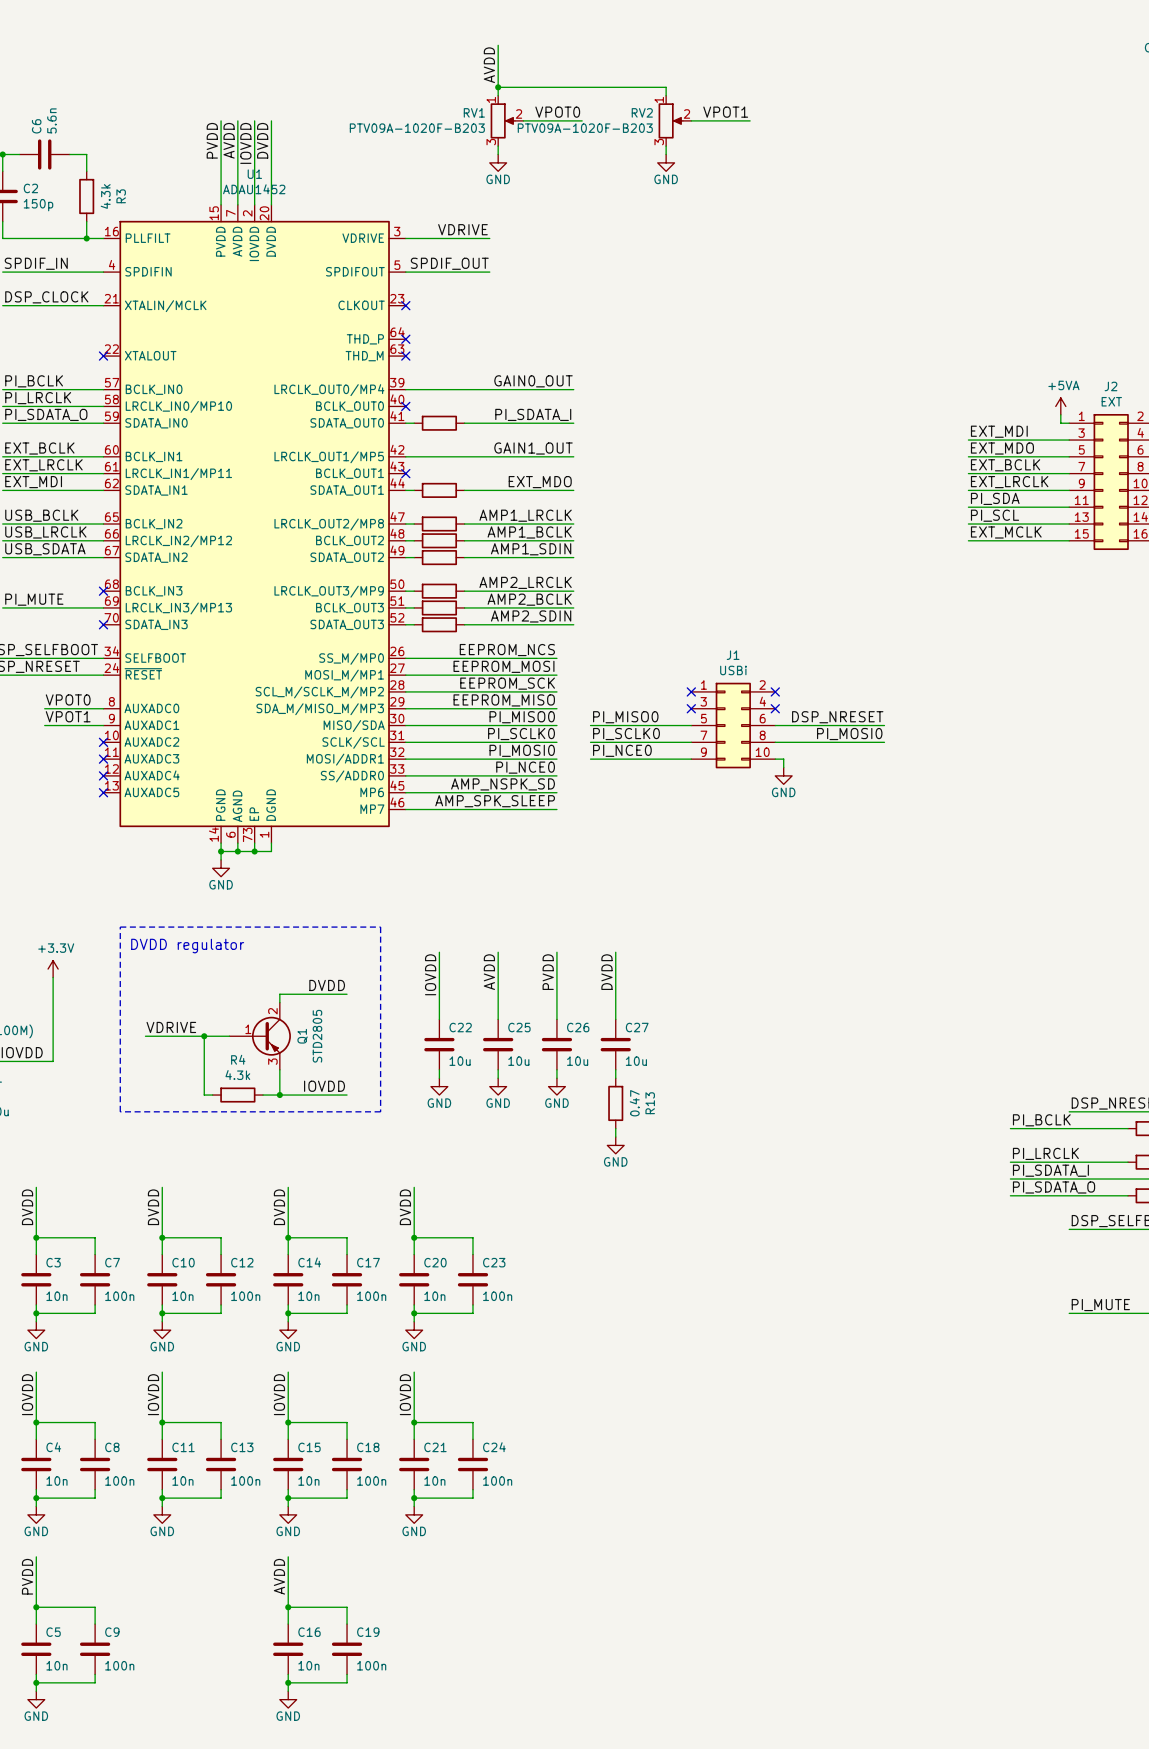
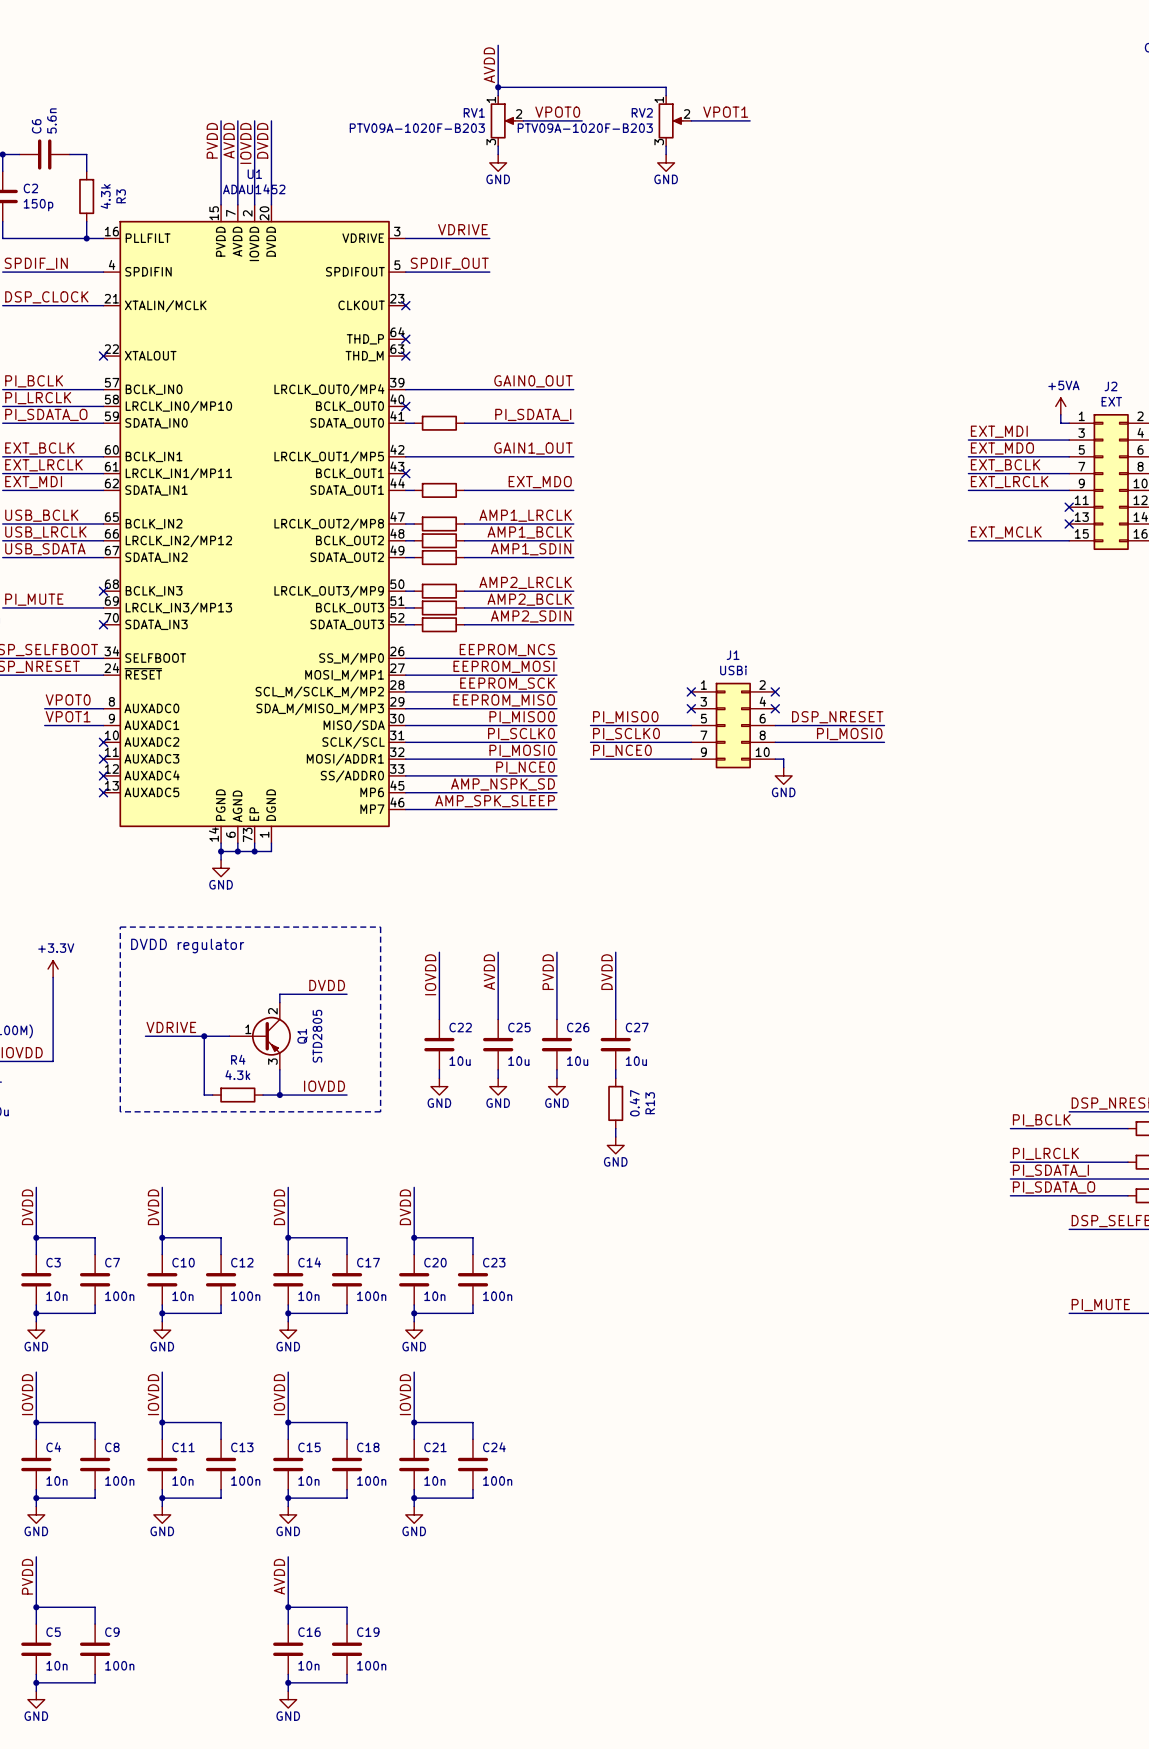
label: PI_SDA (995, 498) -> none
wire: (968, 507) (1069, 507) -> none
no-connect mark: none -> (1069, 507)
label: PI_SCL (995, 515) -> none
wire: (968, 524) (1069, 524) -> none
no-connect mark: none -> (1069, 524)

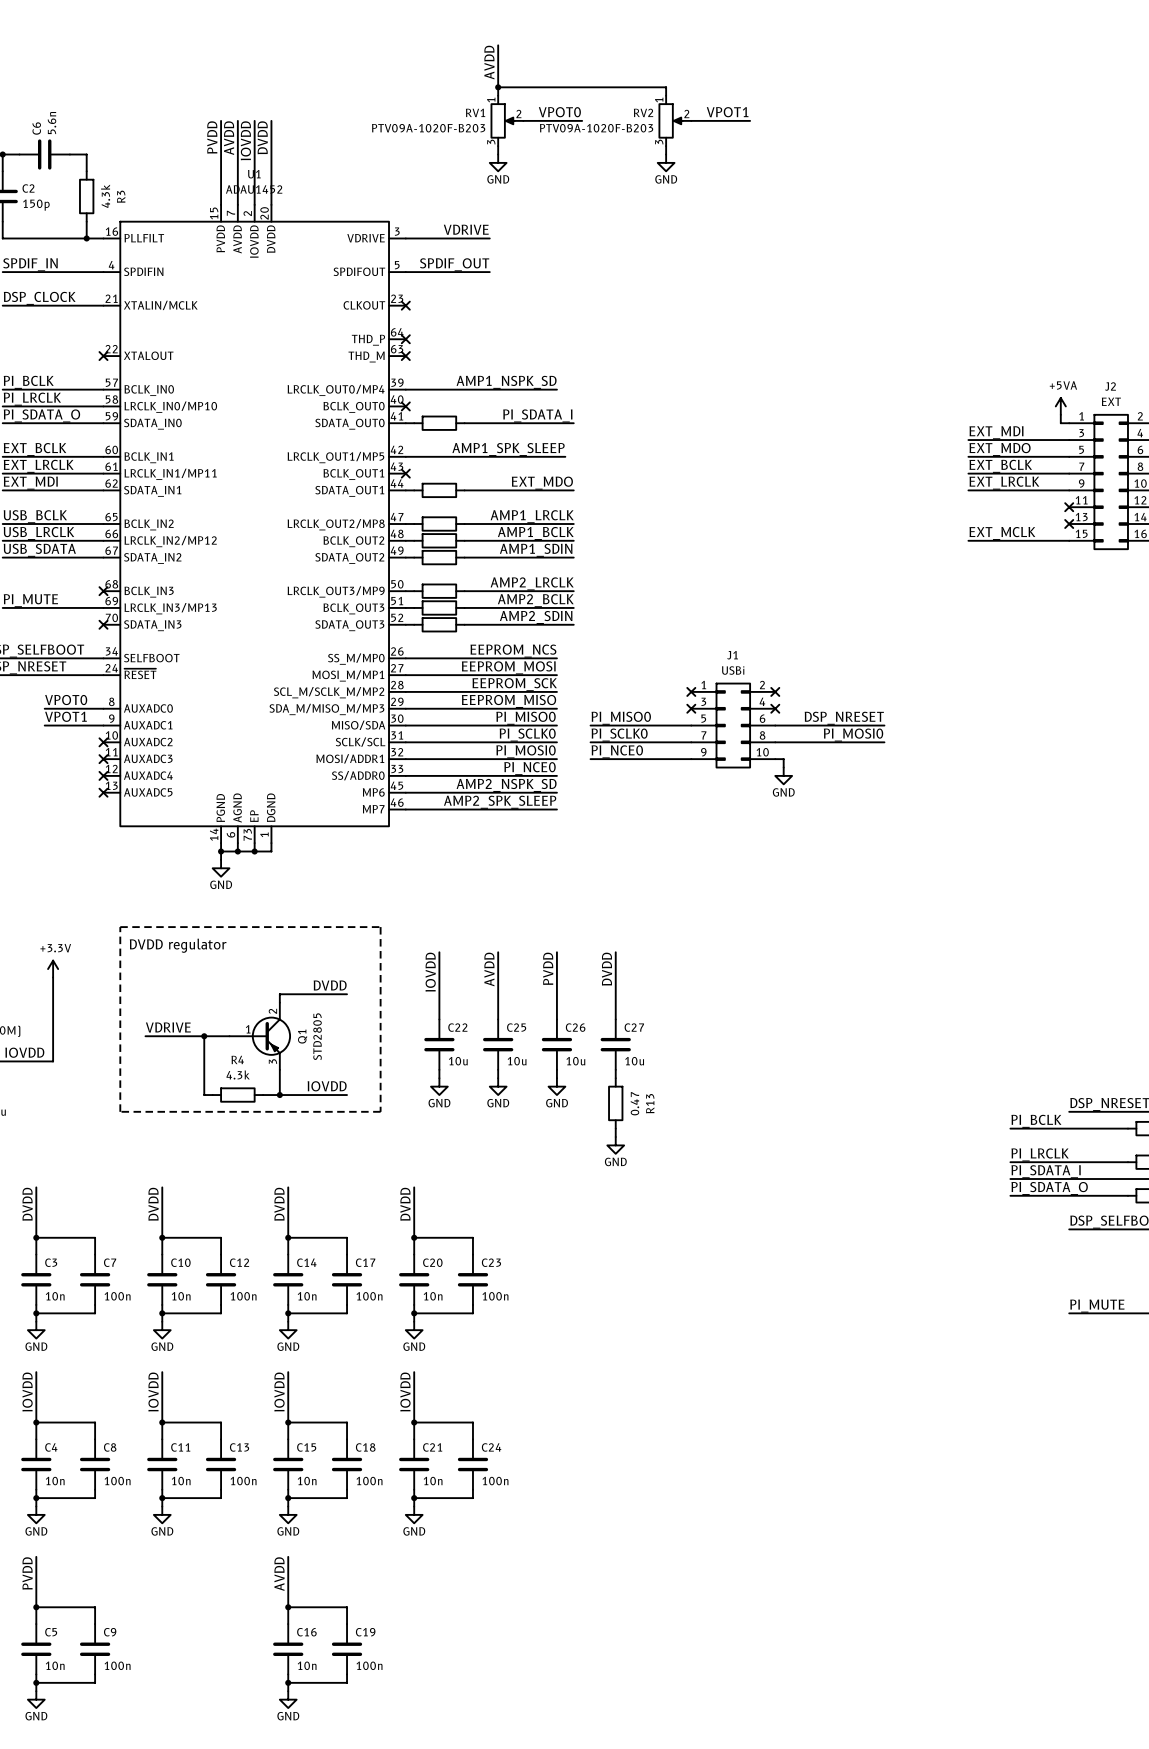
label: none -> AMP1_NSPK_SD (506, 382)
label: GAIN0_OUT (533, 381) -> none
wire: (556, 389) (573, 389) -> none
label: none -> AMP1_SPK_SLEEP (508, 449)
label: GAIN1_OUT (533, 448) -> none
wire: (565, 456) (573, 456) -> none
label: AMP_NSPK_SD (503, 784) -> AMP2_NSPK_SD (506, 785)
label: AMP_SPK_SLEEP (495, 801) -> AMP2_SPK_SLEEP (500, 802)

